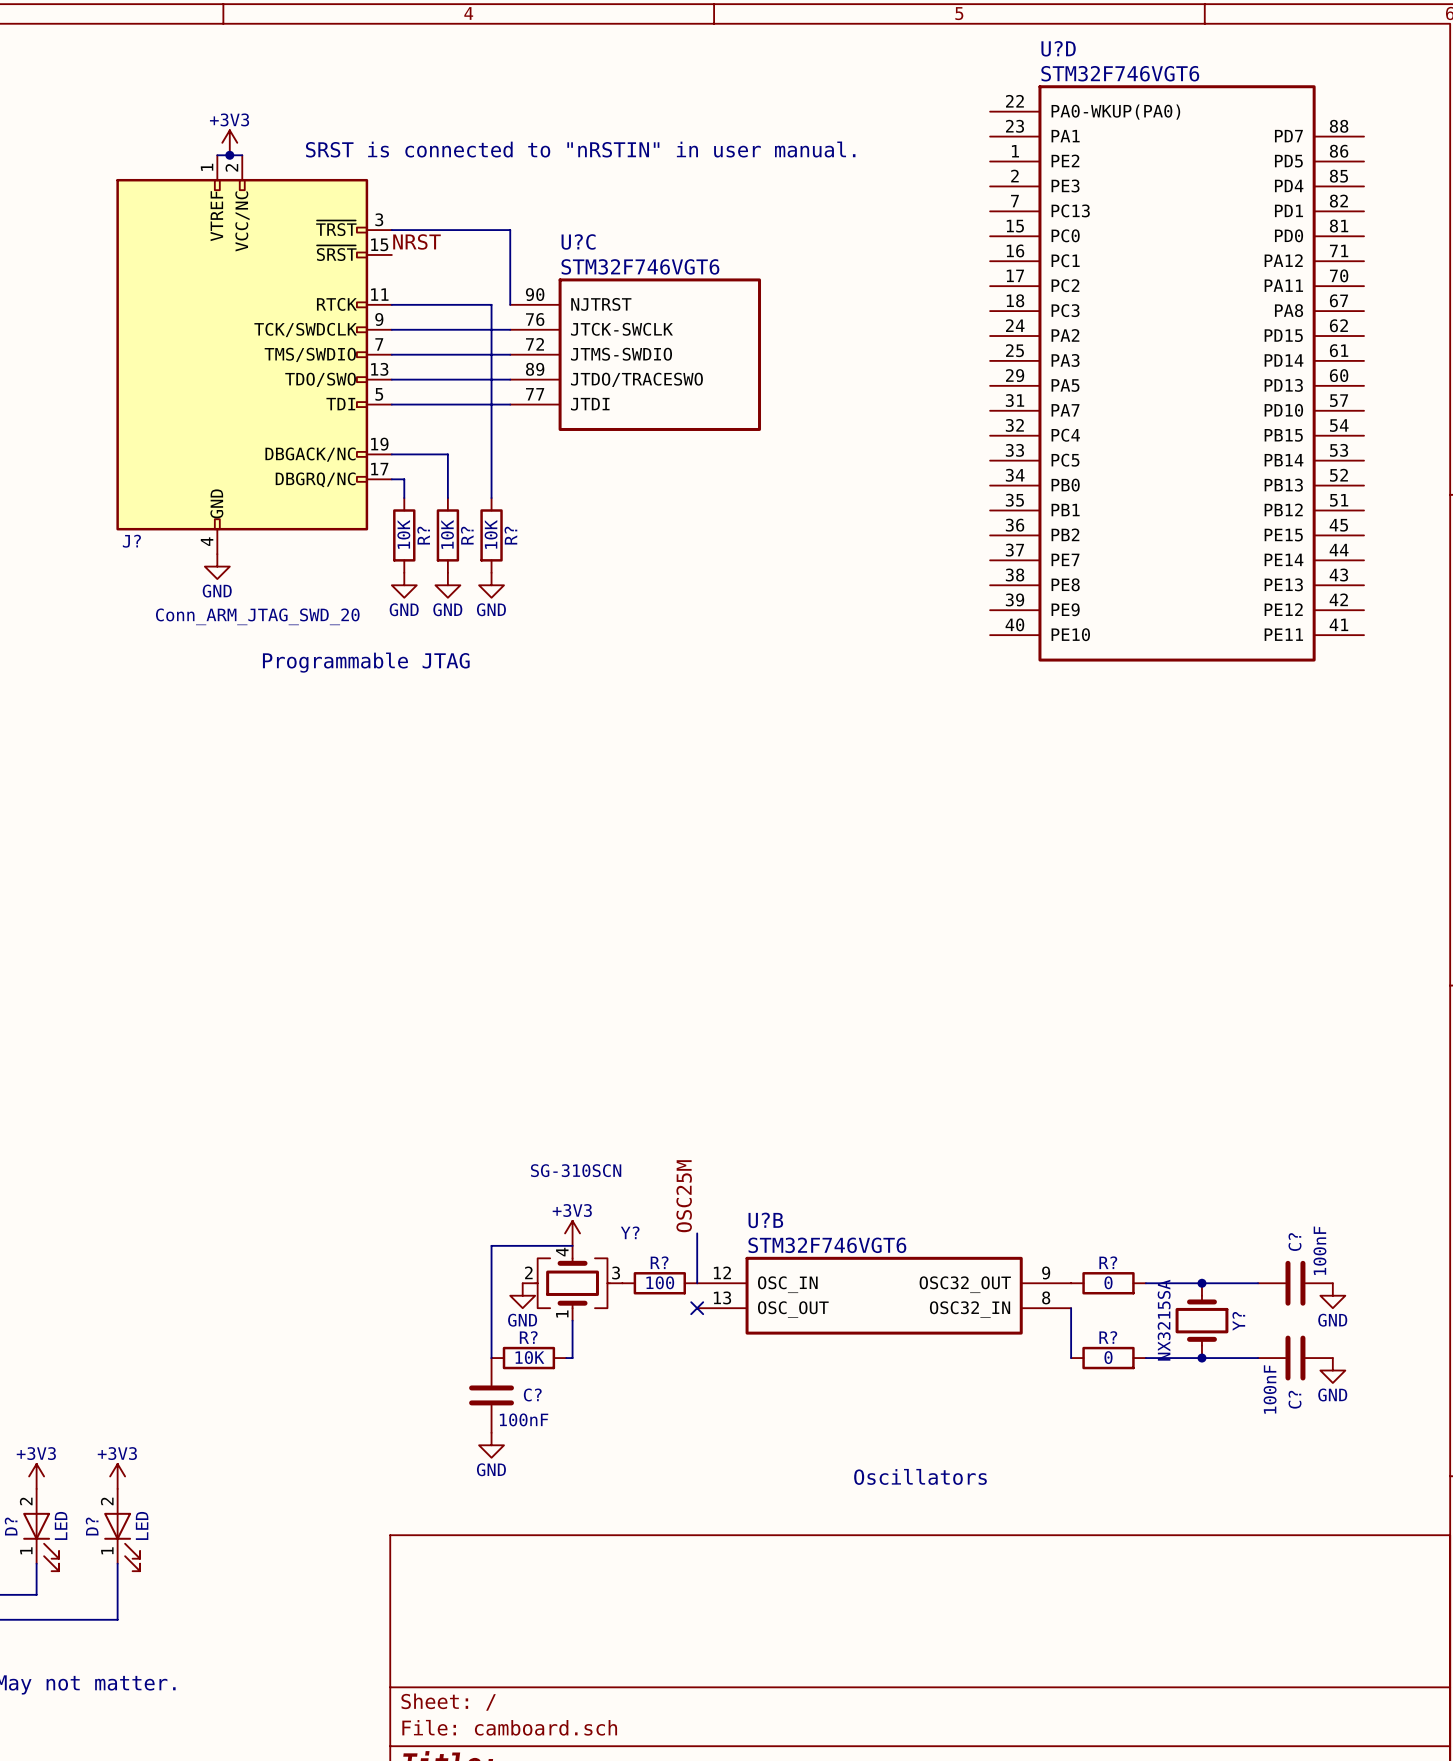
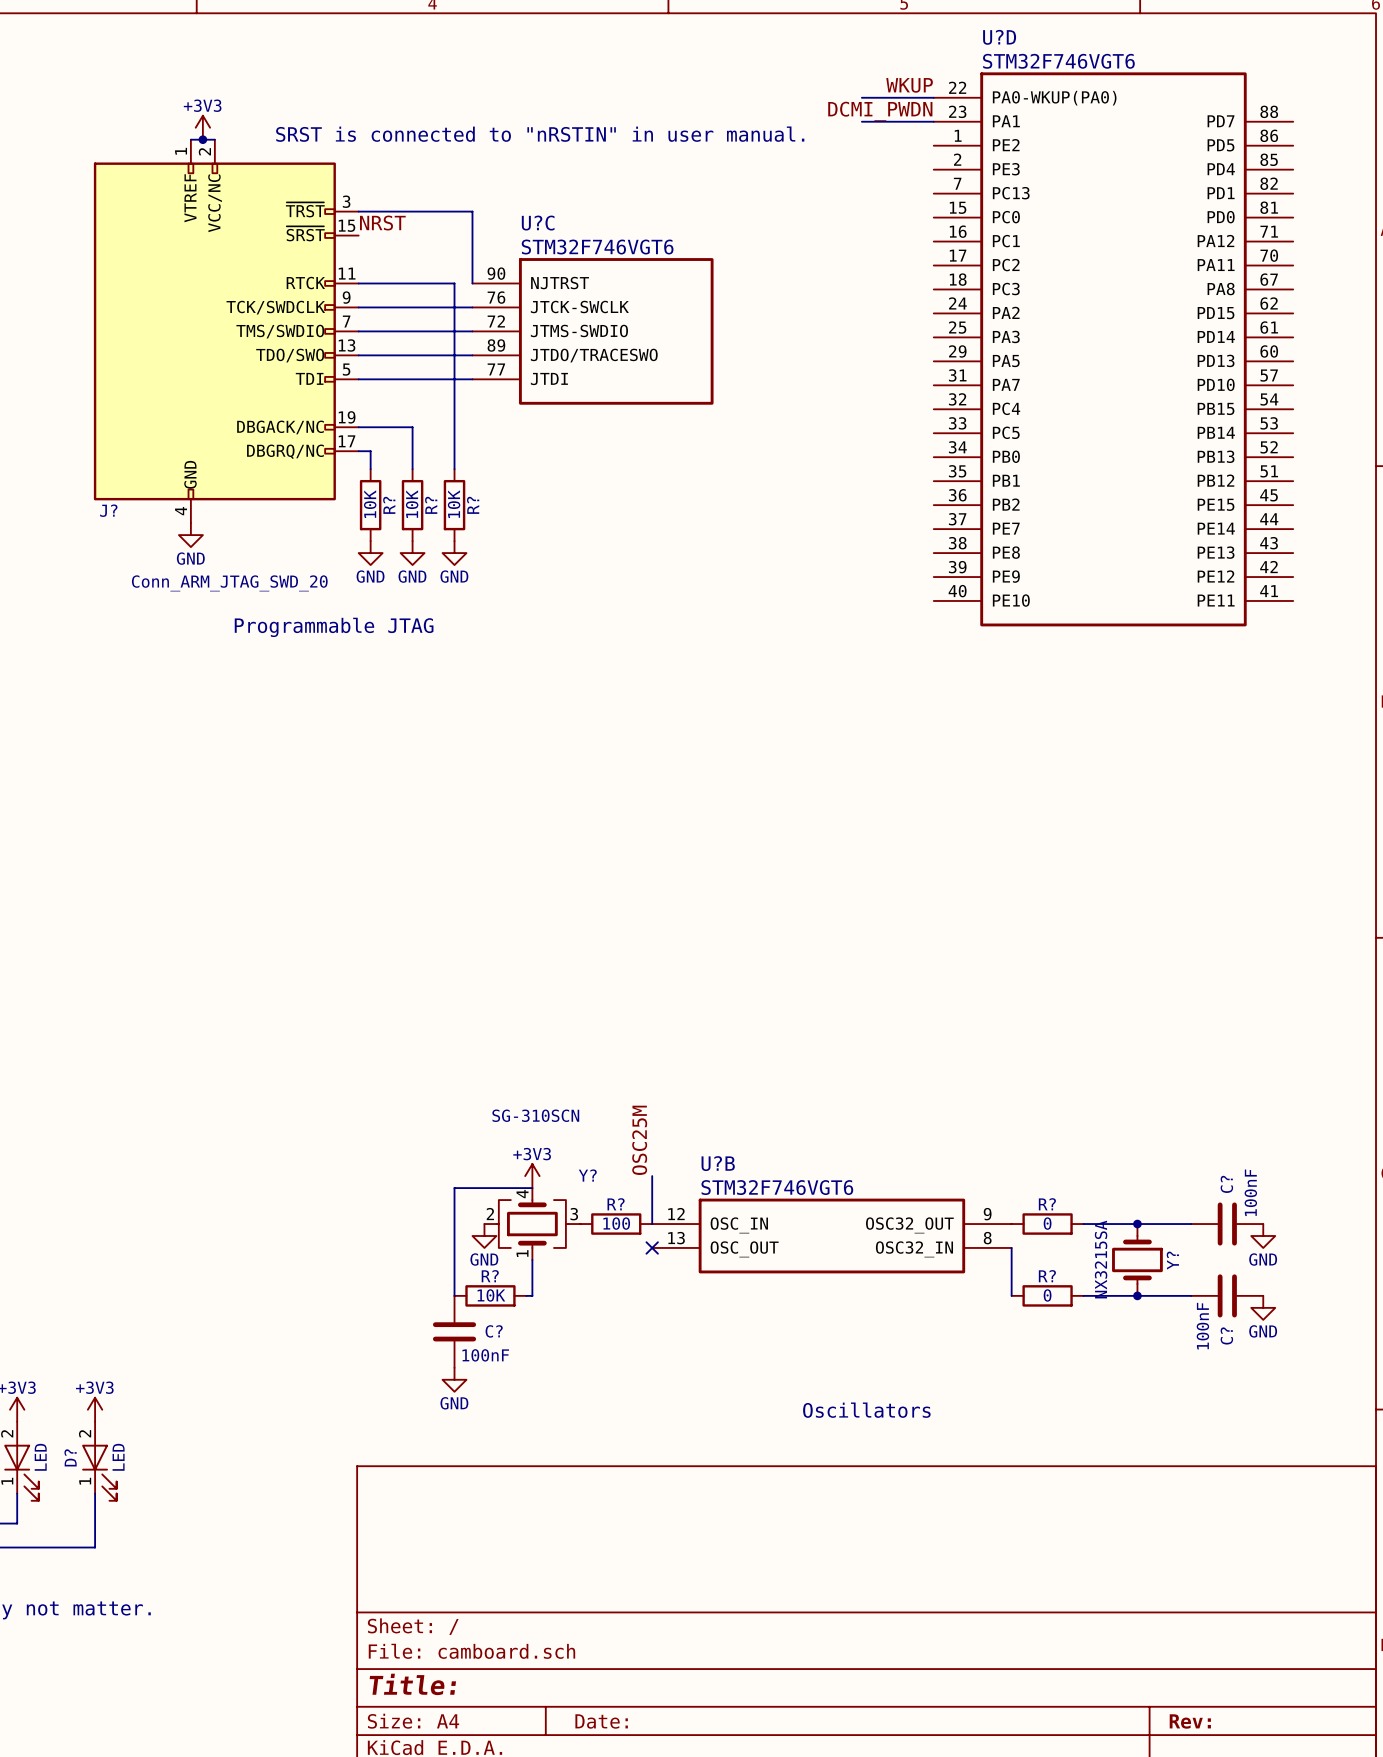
label: none -> WKUP (909, 85)
wire: none -> (861, 97) (933, 97)
label: none -> DCMI_PWDN (880, 111)
wire: none -> (861, 121) (933, 121)

